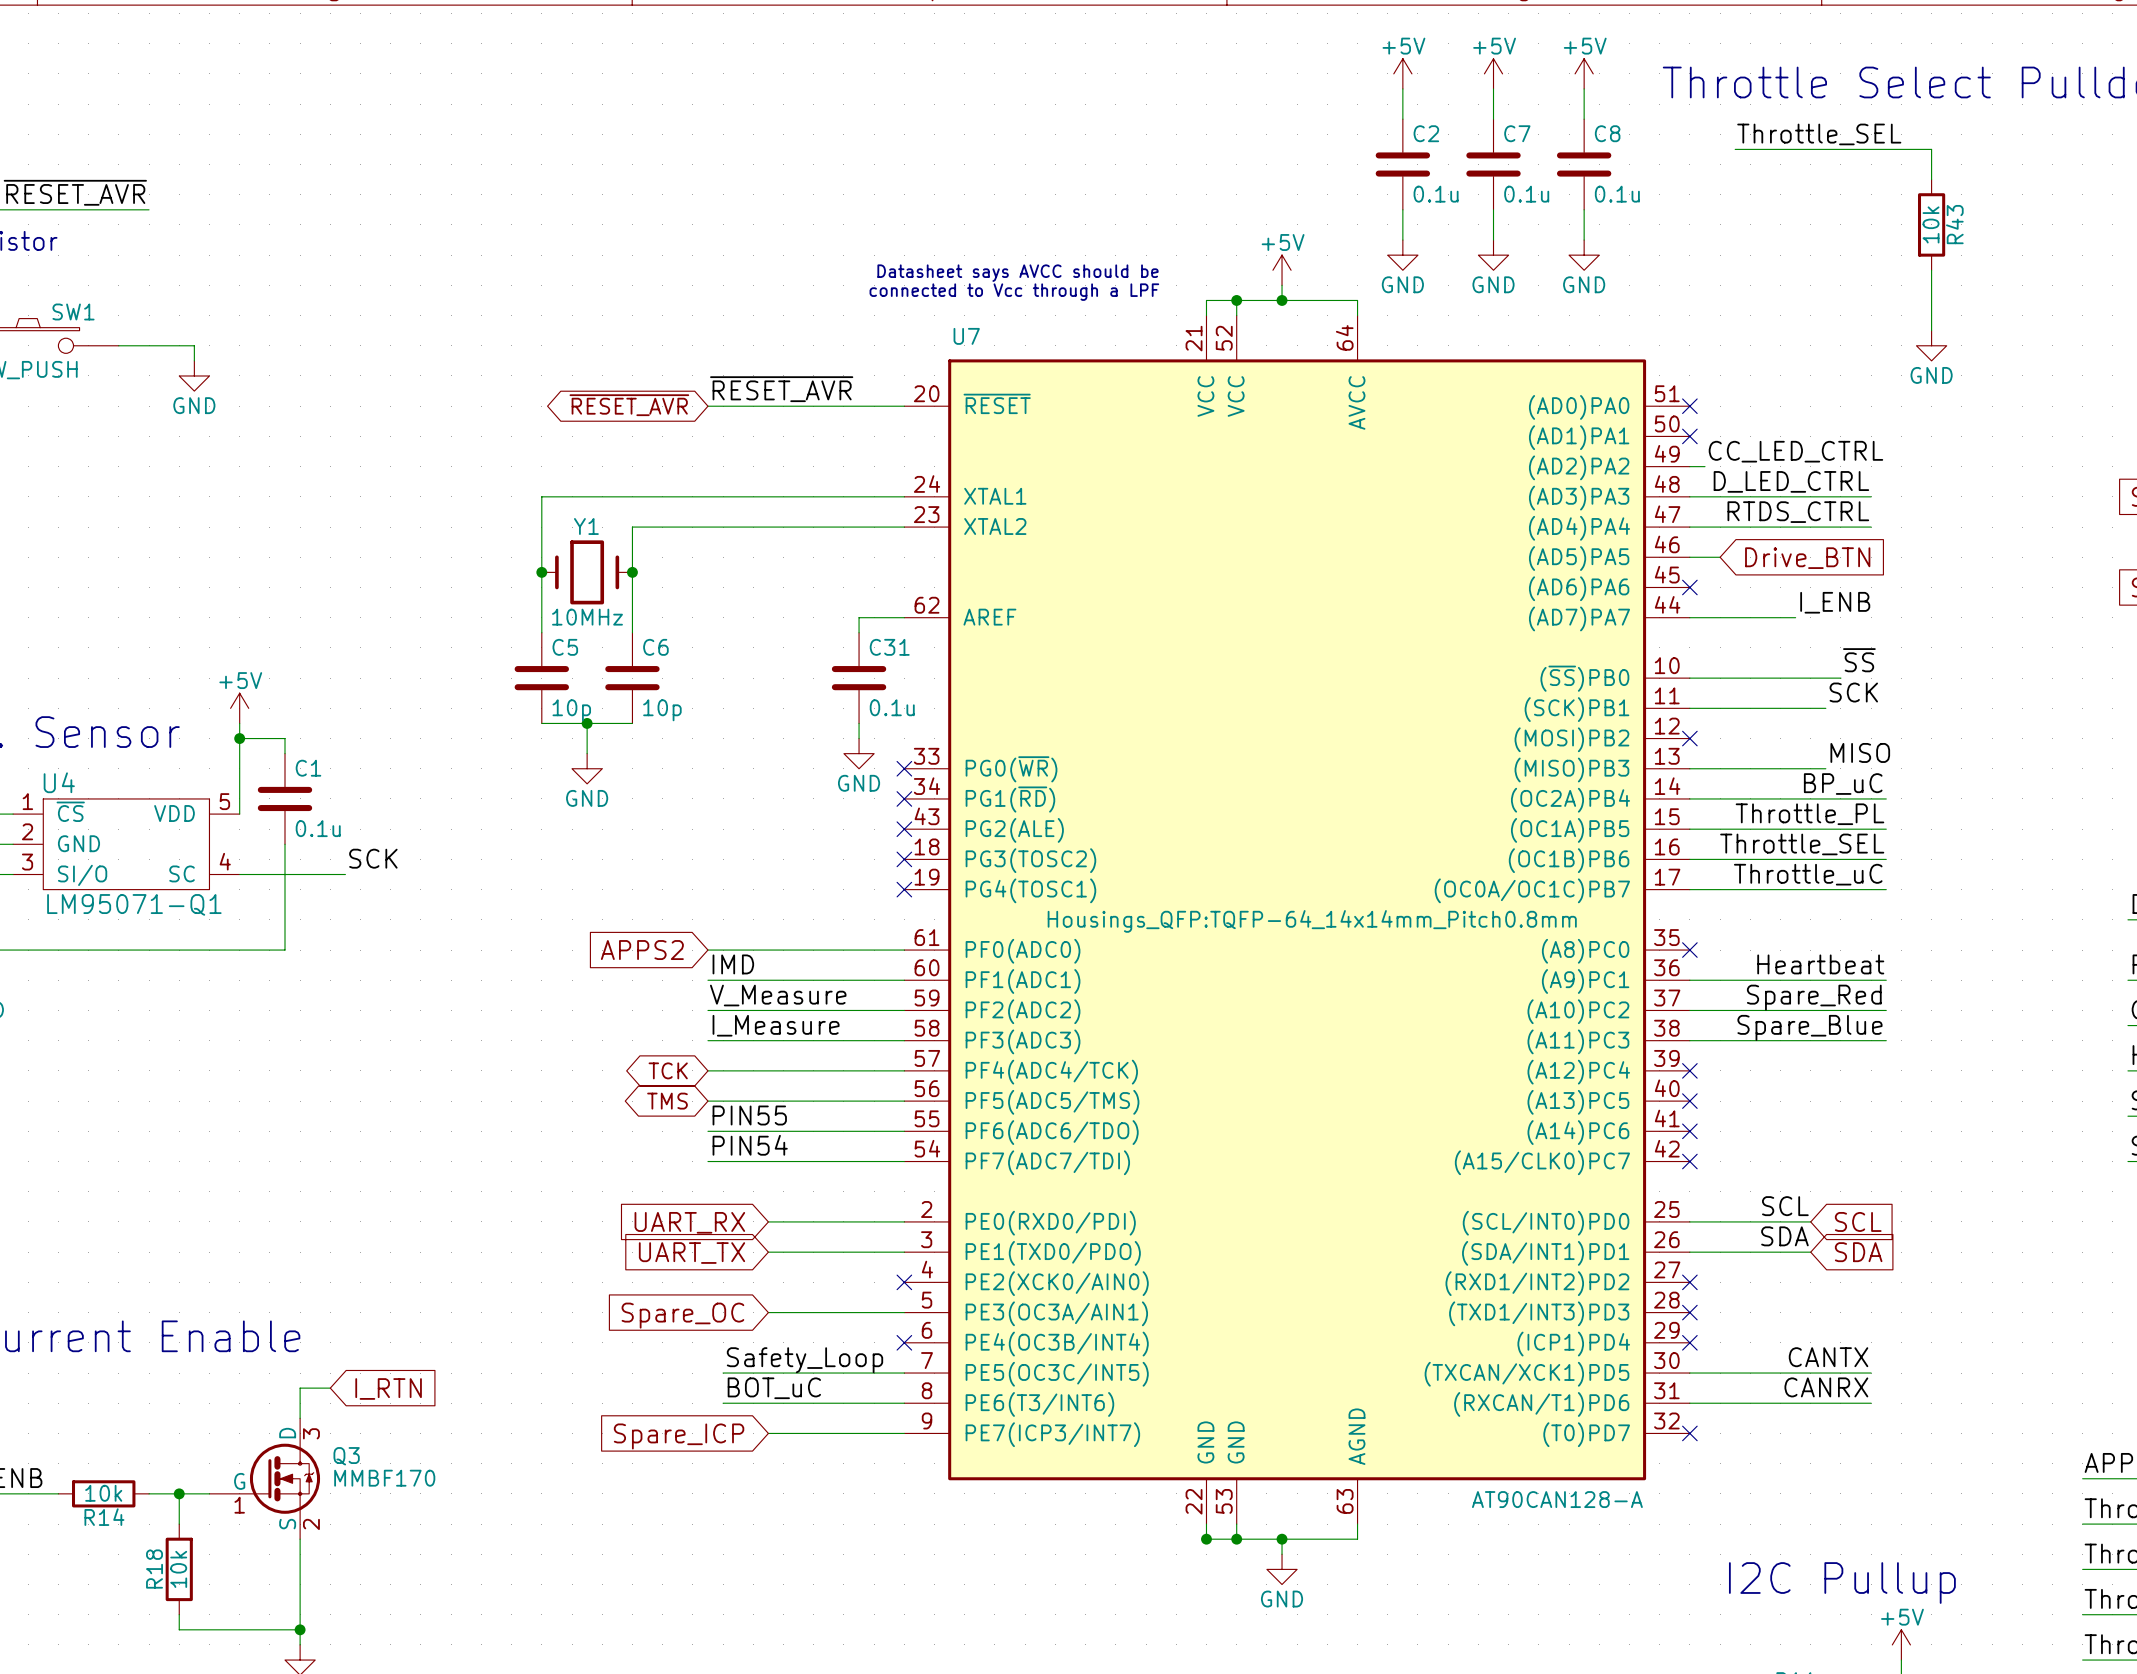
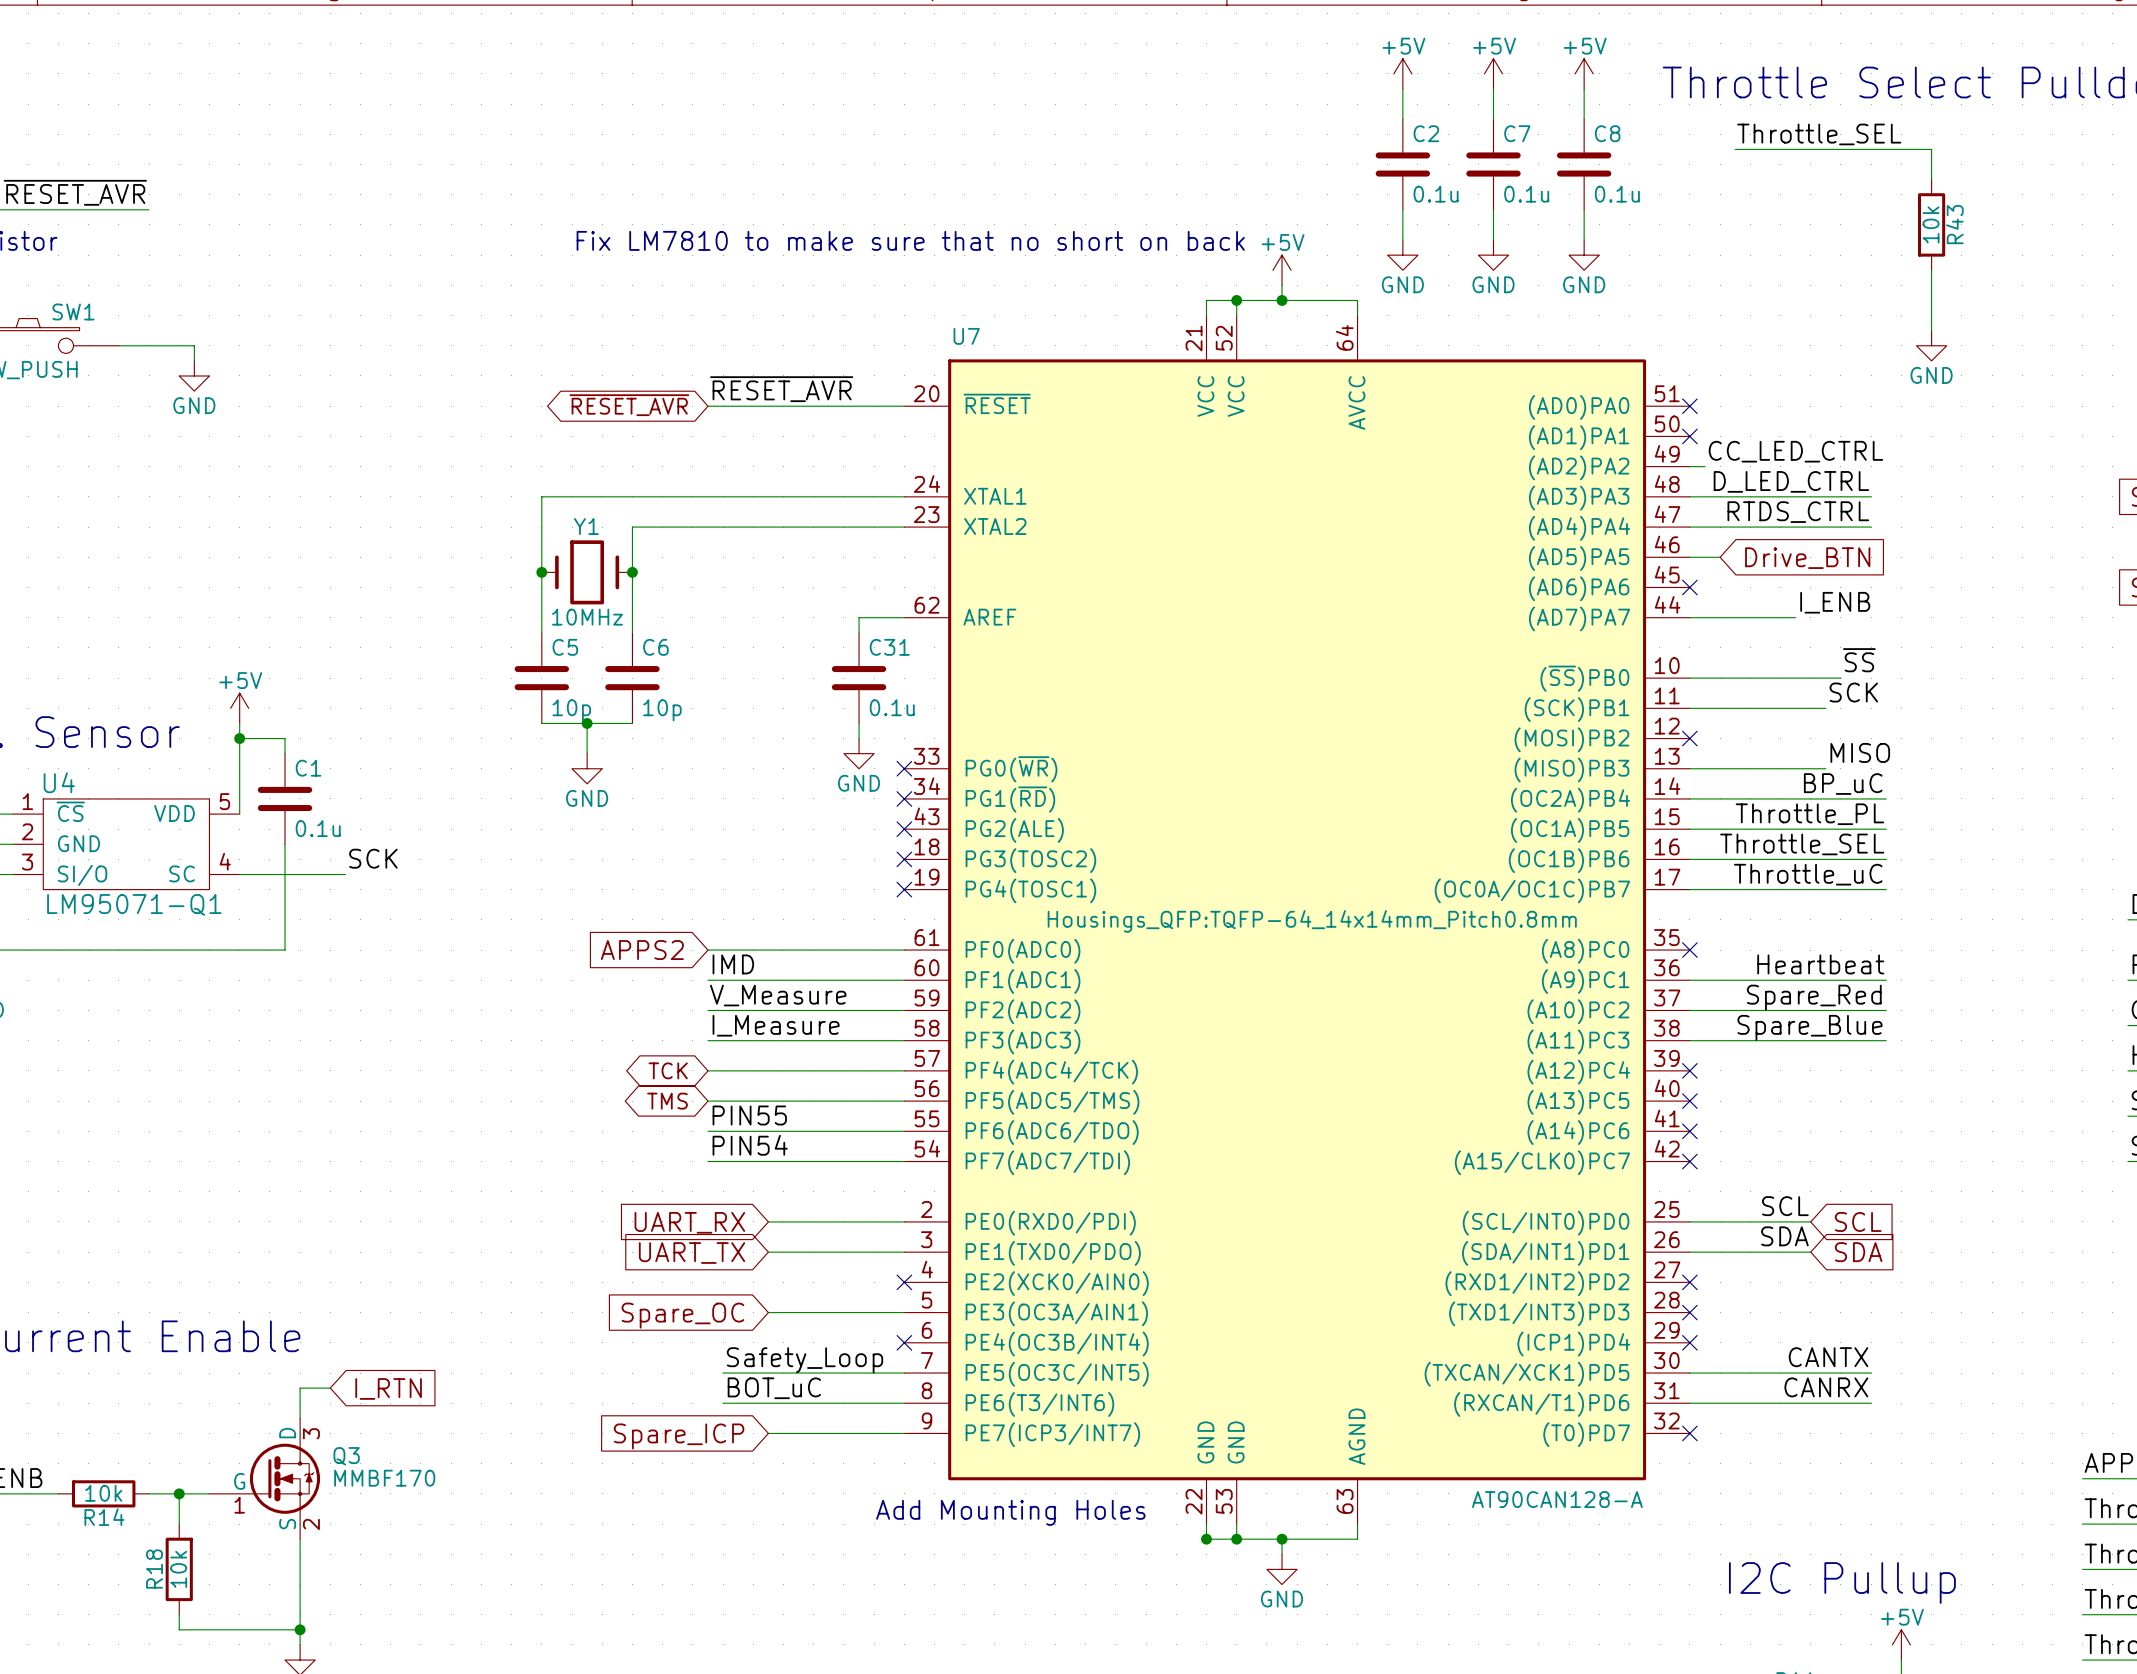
text: none -> Fix LM7810 to make sure that no short on back (910, 240)
text: Datasheet says AVCC should be (1018, 273) -> none
text: connected to Vcc through a LPF (1014, 292) -> none
text: none -> Add Mounting Holes (1010, 1512)

